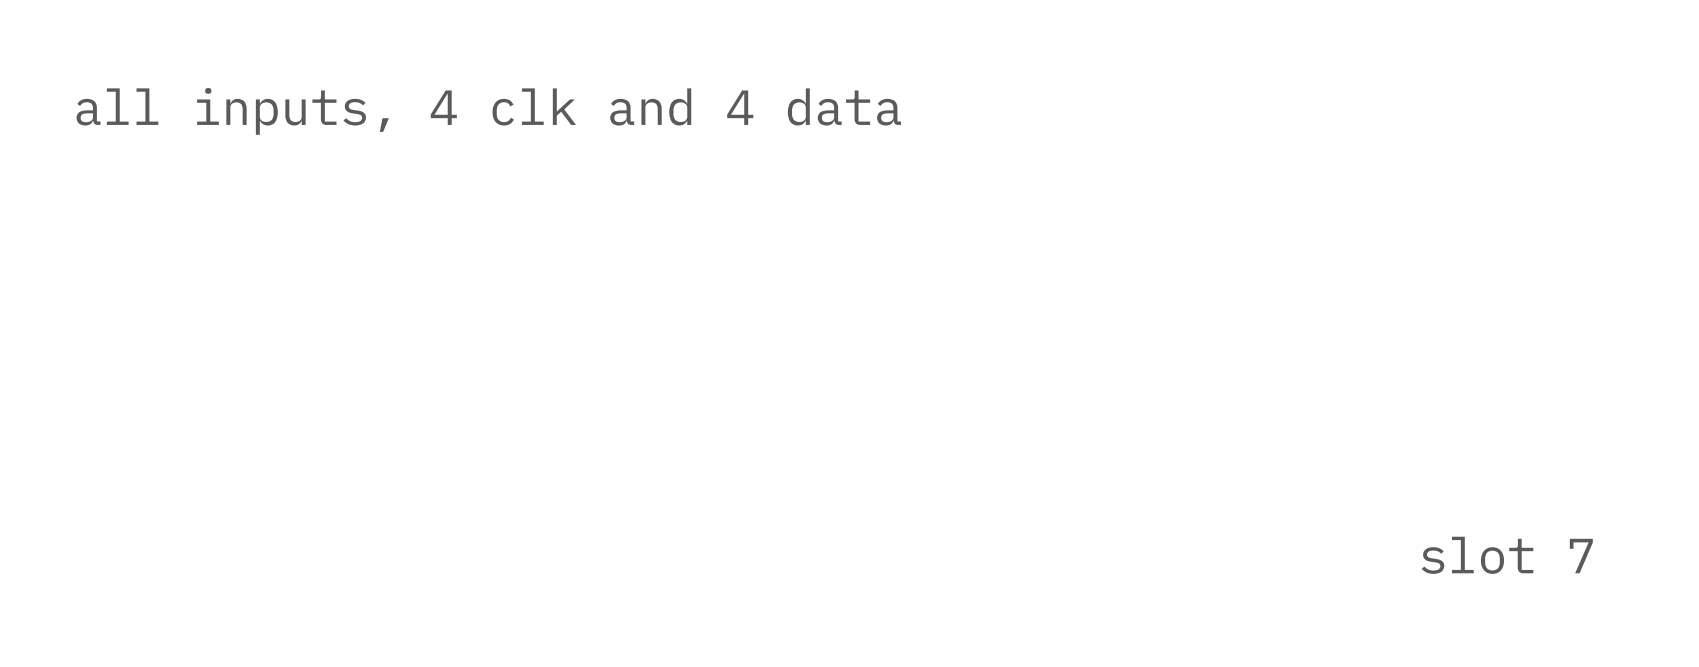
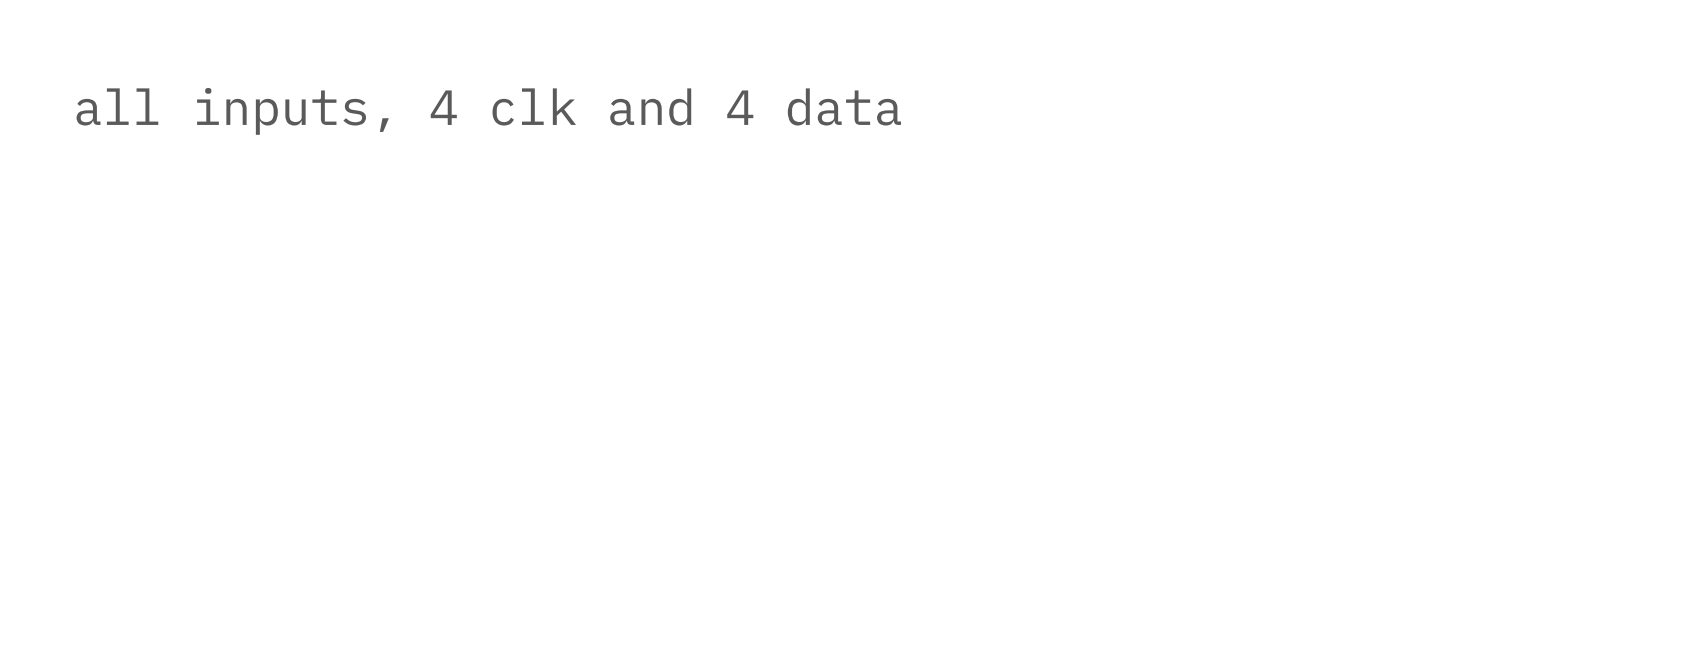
text: slot 7 (1507, 555) -> none

